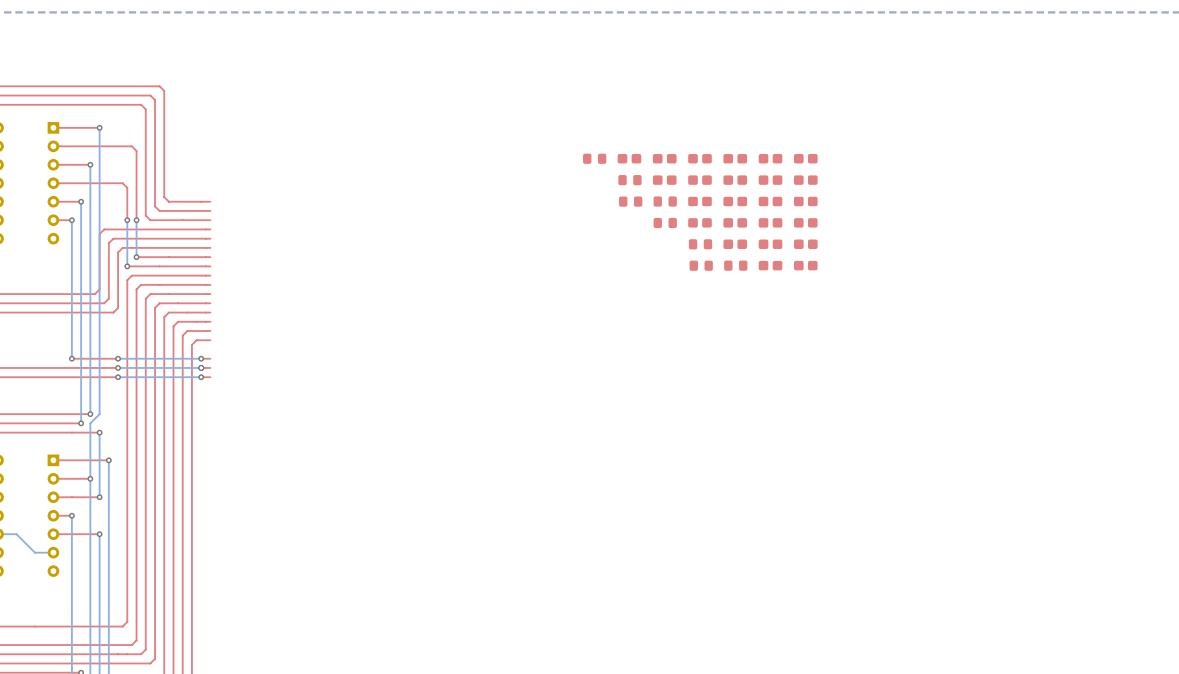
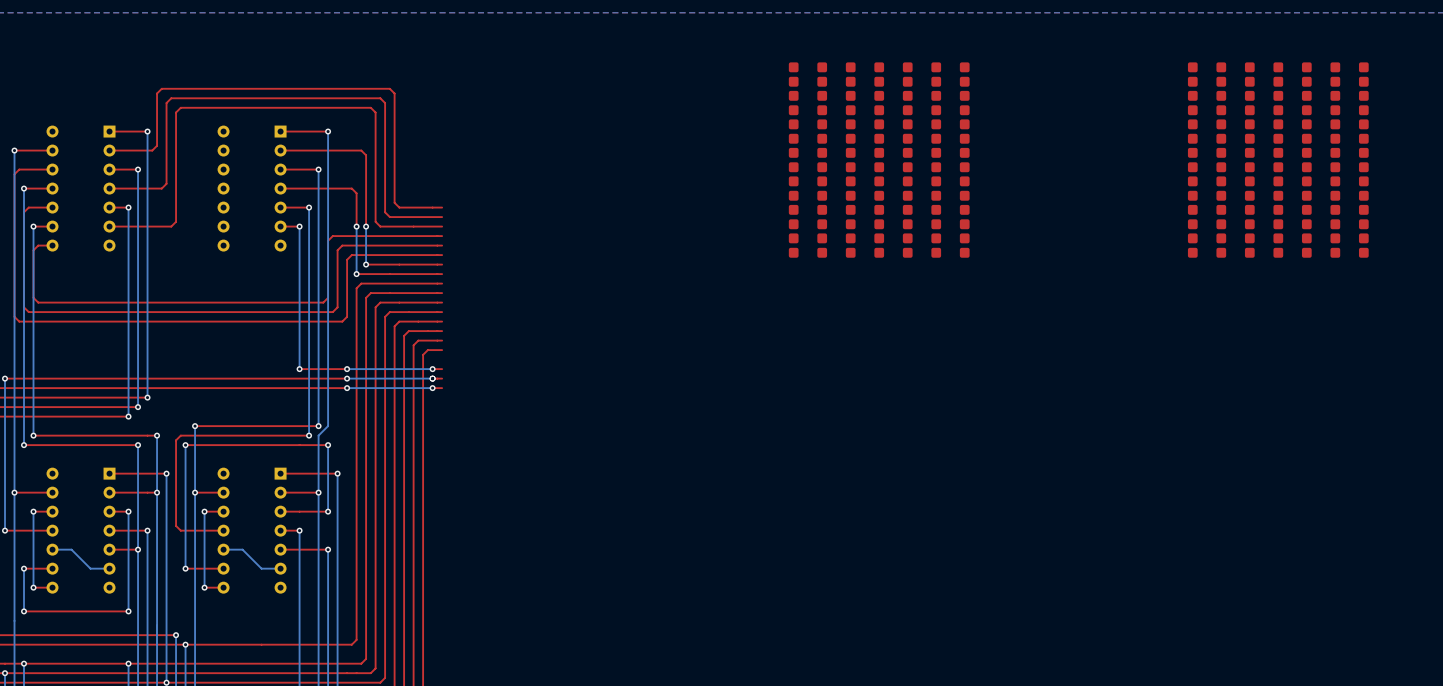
part: none -> (793, 74)
part: none -> (822, 74)
part: none -> (850, 74)
part: none -> (879, 74)
part: none -> (907, 74)
part: none -> (936, 74)
part: none -> (964, 74)
part: none -> (1192, 74)
part: none -> (1221, 74)
part: none -> (1249, 74)
part: none -> (1278, 74)
part: none -> (1306, 74)
part: none -> (1335, 74)
part: none -> (1363, 74)
part: none -> (793, 103)
part: none -> (822, 103)
part: none -> (850, 103)
part: none -> (879, 103)
part: none -> (907, 103)
part: none -> (936, 103)
part: none -> (964, 103)
part: none -> (1192, 103)
part: none -> (1221, 103)
part: none -> (1249, 103)
part: none -> (1278, 103)
part: none -> (1306, 103)
part: none -> (1335, 103)
part: none -> (1363, 103)
part: none -> (793, 131)
part: none -> (822, 131)
part: none -> (850, 131)
part: none -> (879, 131)
part: none -> (907, 131)
part: none -> (936, 131)
part: none -> (964, 131)
part: none -> (1192, 131)
part: none -> (1221, 131)
part: none -> (1249, 131)
part: none -> (1278, 131)
part: none -> (1306, 131)
part: none -> (1335, 131)
part: none -> (1363, 131)
part: none -> (793, 160)
part: none -> (822, 160)
part: none -> (850, 160)
part: none -> (936, 160)
part: none -> (964, 160)
part: none -> (1192, 160)
part: none -> (1221, 160)
part: none -> (1249, 160)
part: none -> (1278, 160)
part: none -> (1306, 160)
part: none -> (1335, 160)
part: none -> (1363, 160)
part: (594, 158) -> none
part rotation: 0° (629, 158) -> 90° clockwise (879, 160)
part rotation: 0° (664, 158) -> 90° clockwise (907, 160)
part: (699, 158) -> none
part: (735, 158) -> none
part: (770, 158) -> none
part: (805, 158) -> none
part footprint: [618, 175, 642, 186] -> [874, 176, 885, 201]
part rotation: 0° (664, 180) -> 90° clockwise (907, 188)
part: (699, 180) -> none
part: (735, 180) -> none
part: (770, 180) -> none
part: (805, 180) -> none
part: none -> (793, 188)
part: none -> (822, 188)
part: none -> (850, 188)
part: none -> (936, 188)
part: none -> (964, 188)
part: none -> (1192, 188)
part: none -> (1221, 188)
part: none -> (1249, 188)
part: none -> (1278, 188)
part: none -> (1306, 188)
part: none -> (1335, 188)
part: none -> (1363, 188)
part: (630, 201) -> none
part: (665, 201) -> none
part: (699, 201) -> none
part: (735, 201) -> none
part: (770, 201) -> none
part: (805, 201) -> none
part: none -> (793, 217)
part: none -> (822, 217)
part: none -> (850, 217)
part: none -> (879, 217)
part: none -> (907, 217)
part: none -> (936, 217)
part: none -> (964, 217)
part: none -> (1192, 217)
part: none -> (1221, 217)
part: none -> (1249, 217)
part: none -> (1278, 217)
part: none -> (1306, 217)
part: none -> (1335, 217)
part: none -> (1363, 217)
part: (665, 222) -> none
part: (699, 222) -> none
part: (735, 222) -> none
part: (770, 222) -> none
part: (805, 222) -> none
part: none -> (793, 245)
part: none -> (822, 245)
part: none -> (850, 245)
part: none -> (879, 245)
part: none -> (907, 245)
part: none -> (936, 245)
part: none -> (964, 245)
part: none -> (1192, 245)
part: none -> (1221, 245)
part: none -> (1249, 245)
part: none -> (1278, 245)
part: none -> (1306, 245)
part: none -> (1335, 245)
part: none -> (1363, 245)
part: (700, 244) -> none
part: (735, 244) -> none
part: (770, 244) -> none
part: (805, 244) -> none
part: (701, 265) -> none
part: (735, 265) -> none
part: (770, 265) -> none
part: (805, 265) -> none

